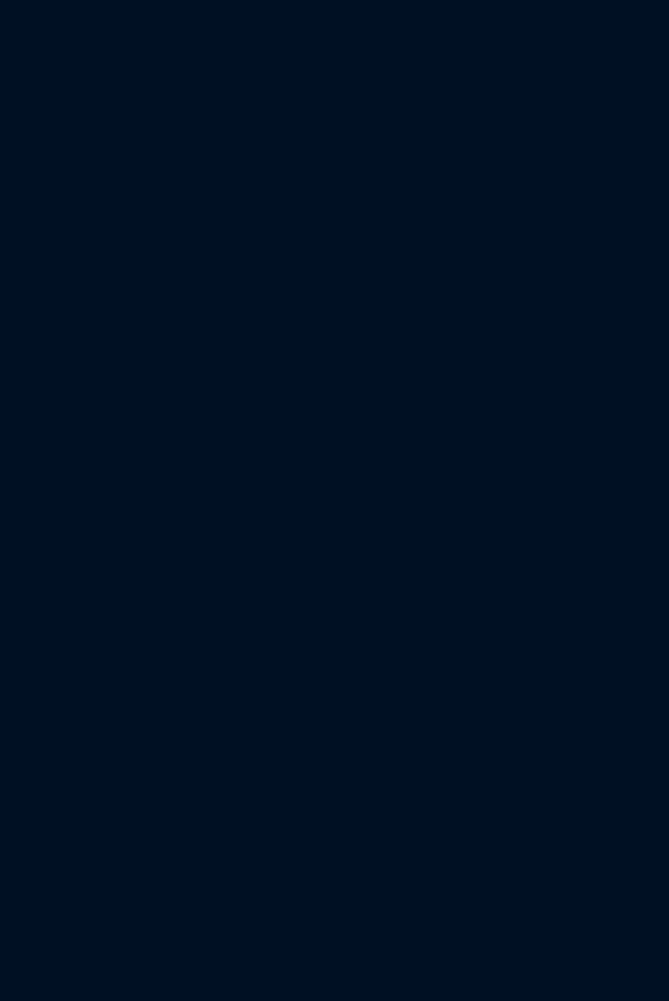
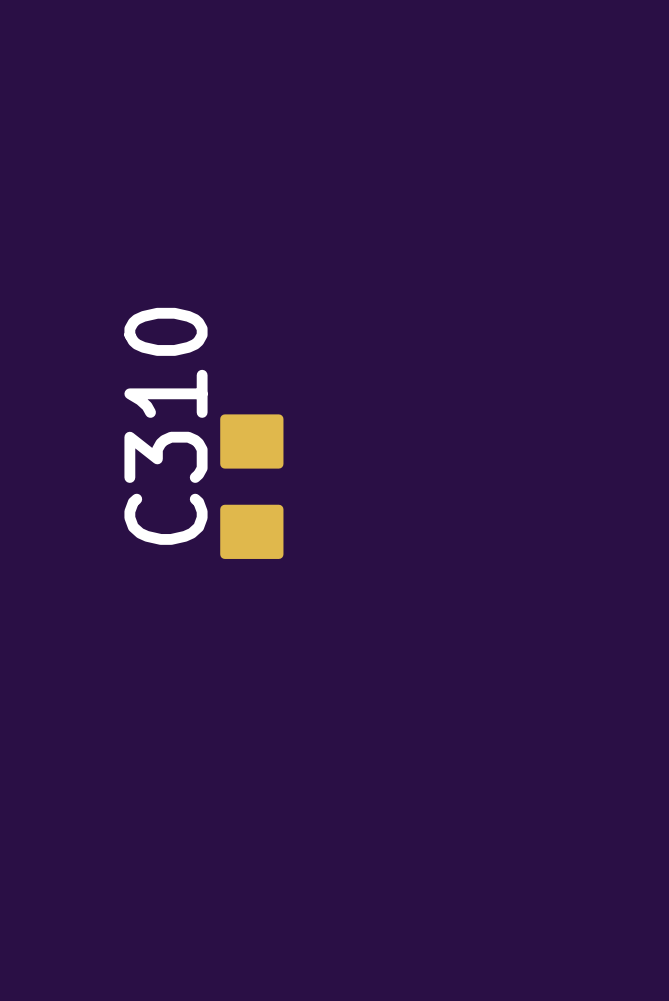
C310: none -> (251, 486)

